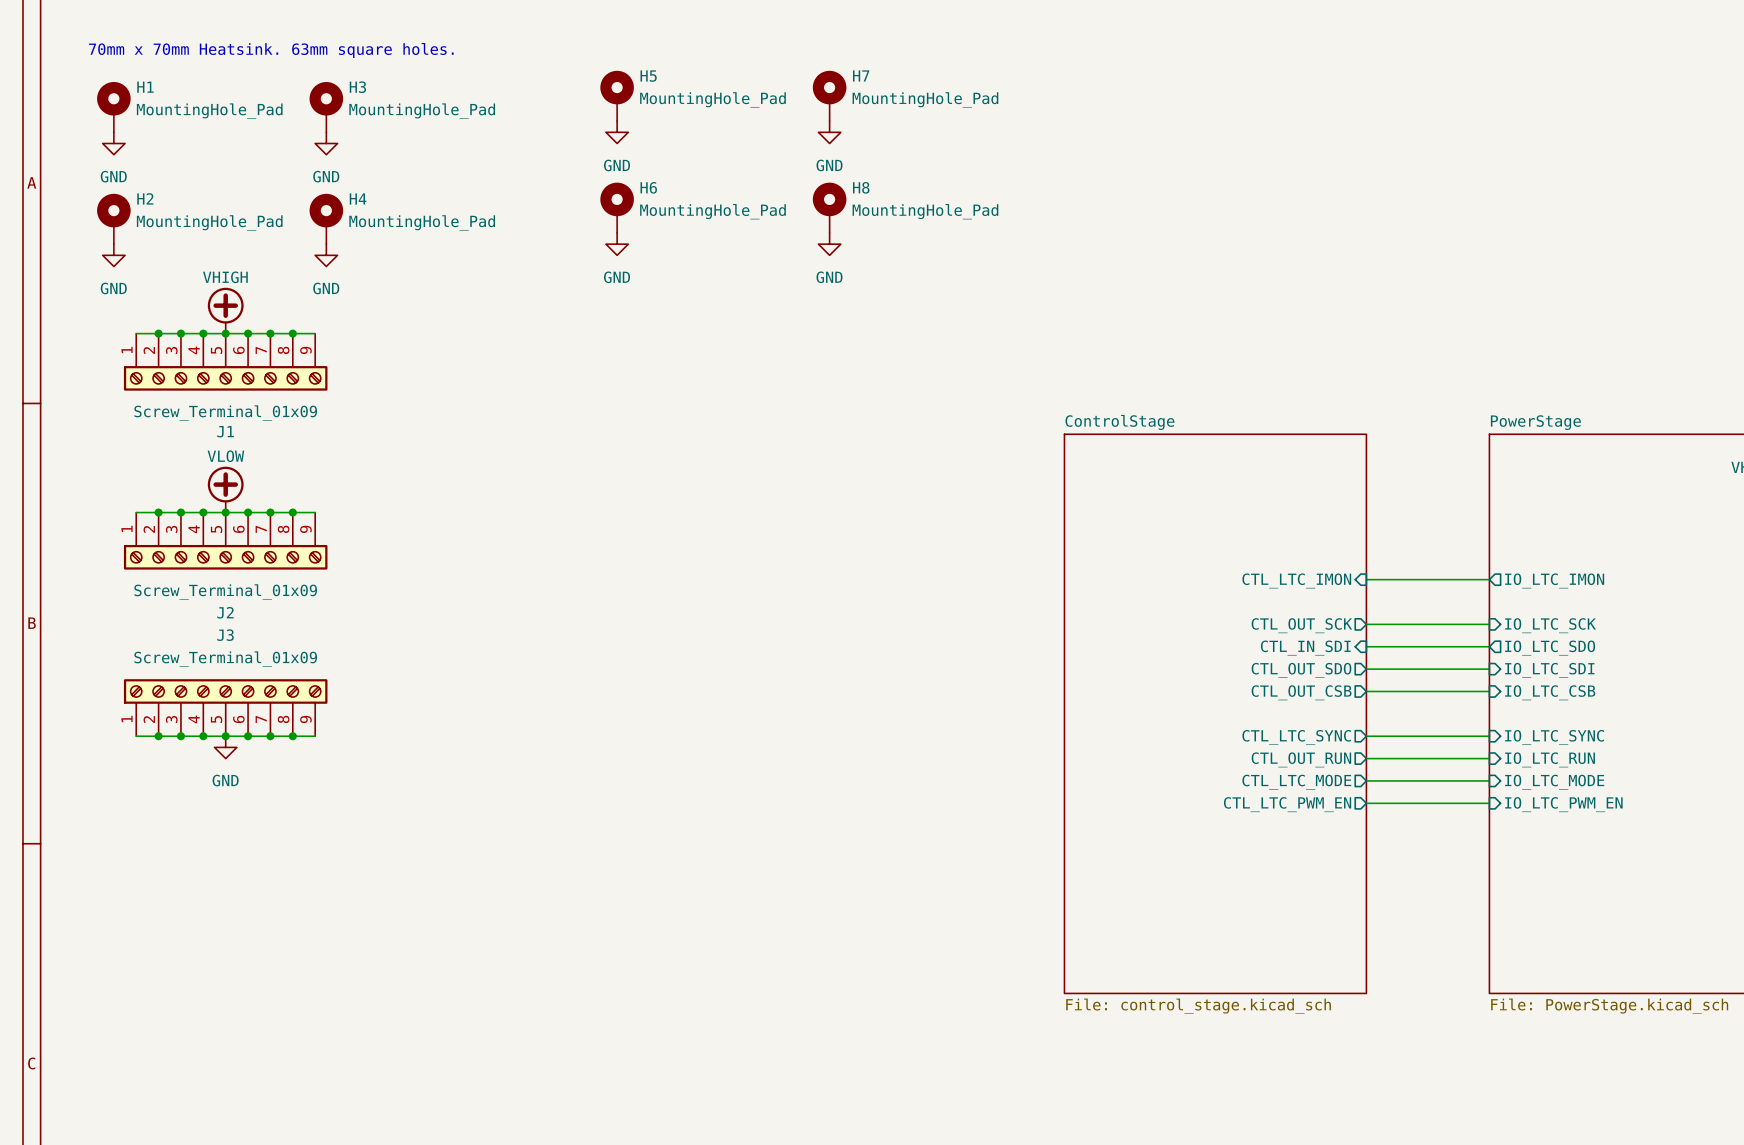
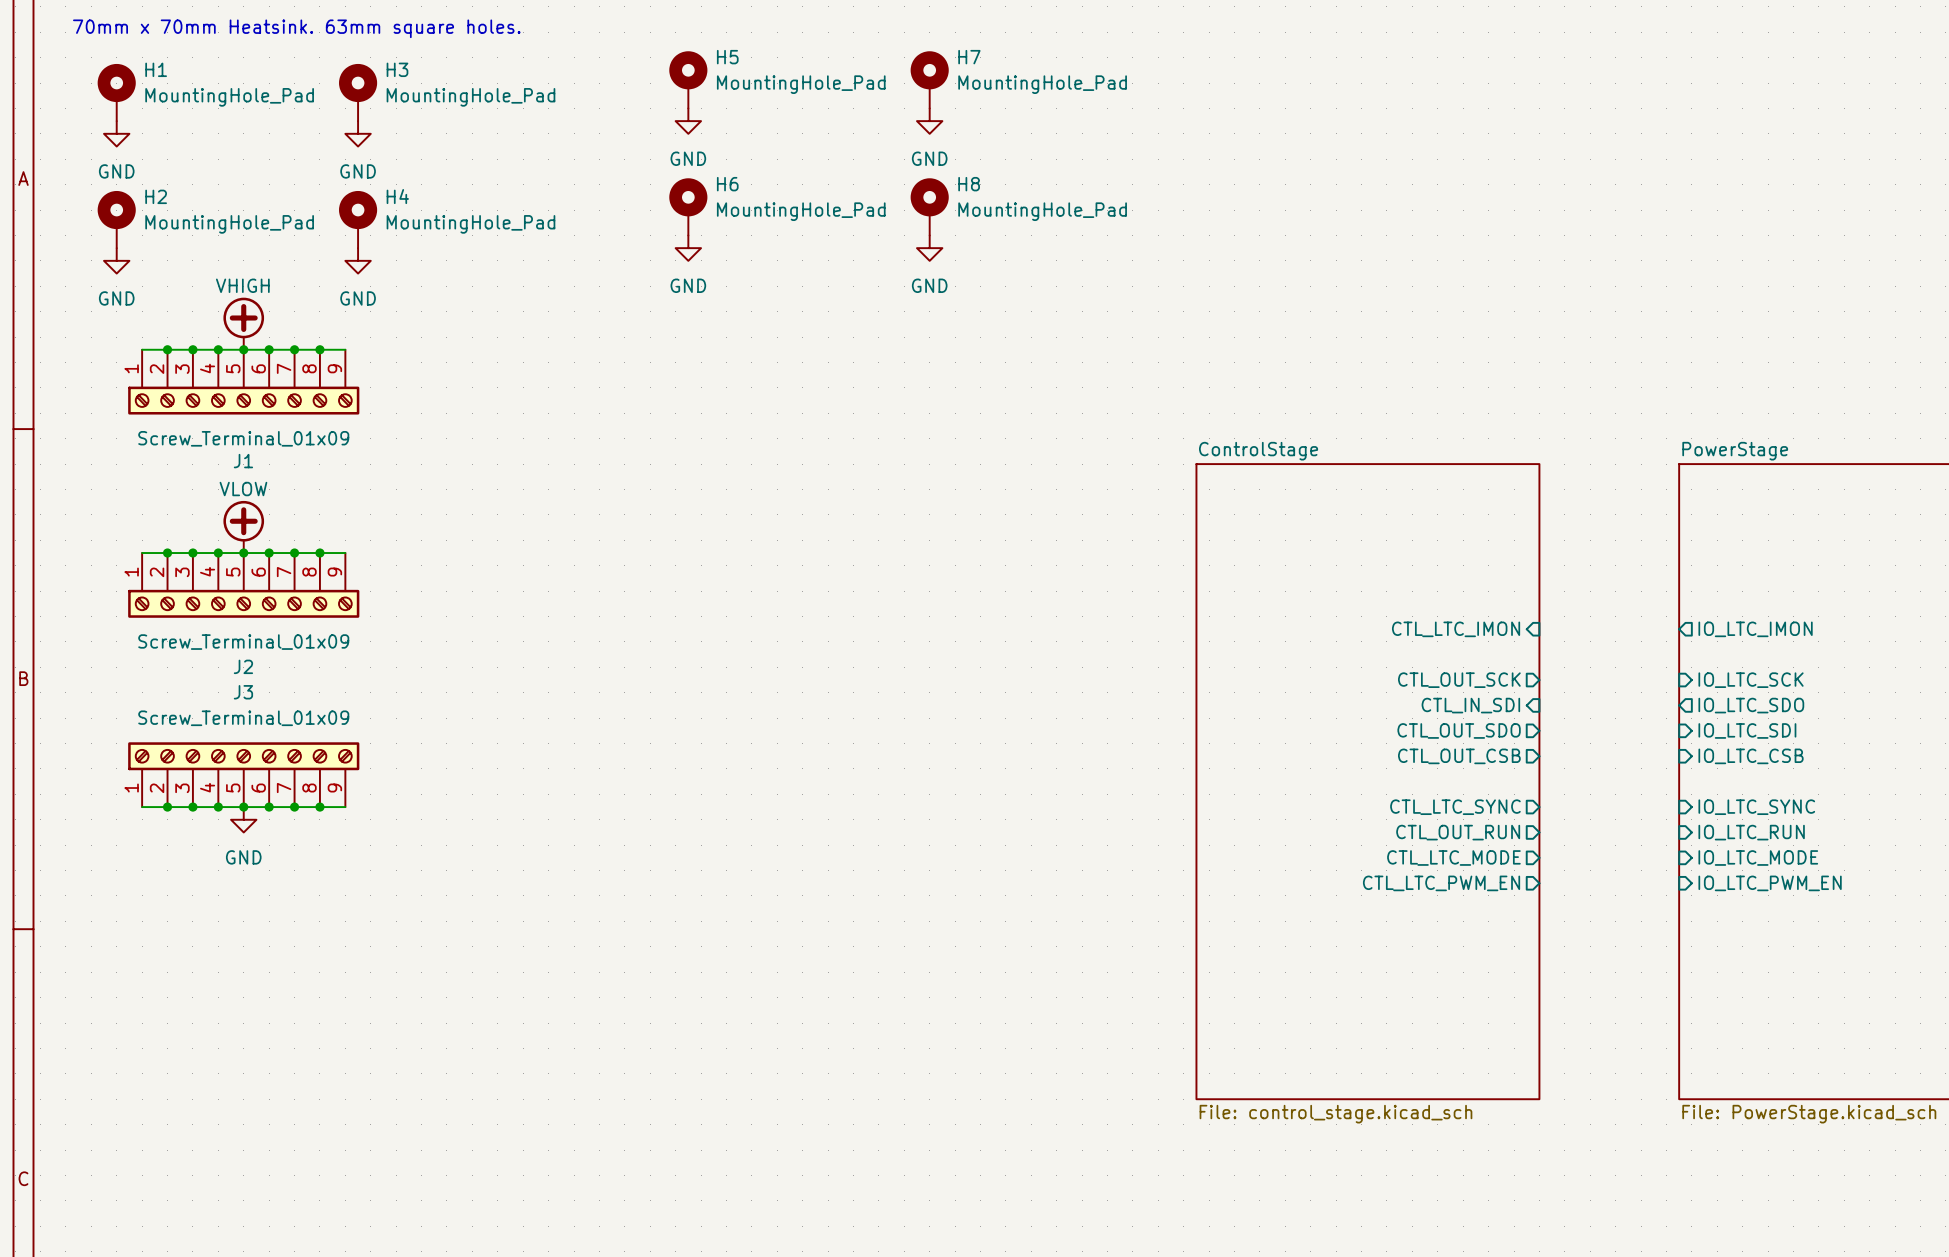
wire: (1366, 579) (1489, 579) -> none
wire: (1366, 624) (1489, 624) -> none
wire: (1366, 646) (1489, 646) -> none
wire: (1366, 669) (1489, 669) -> none
wire: (1366, 691) (1489, 691) -> none
wire: (1366, 736) (1489, 736) -> none
wire: (1366, 758) (1489, 758) -> none
wire: (1366, 780) (1489, 780) -> none
wire: (1366, 803) (1489, 803) -> none

